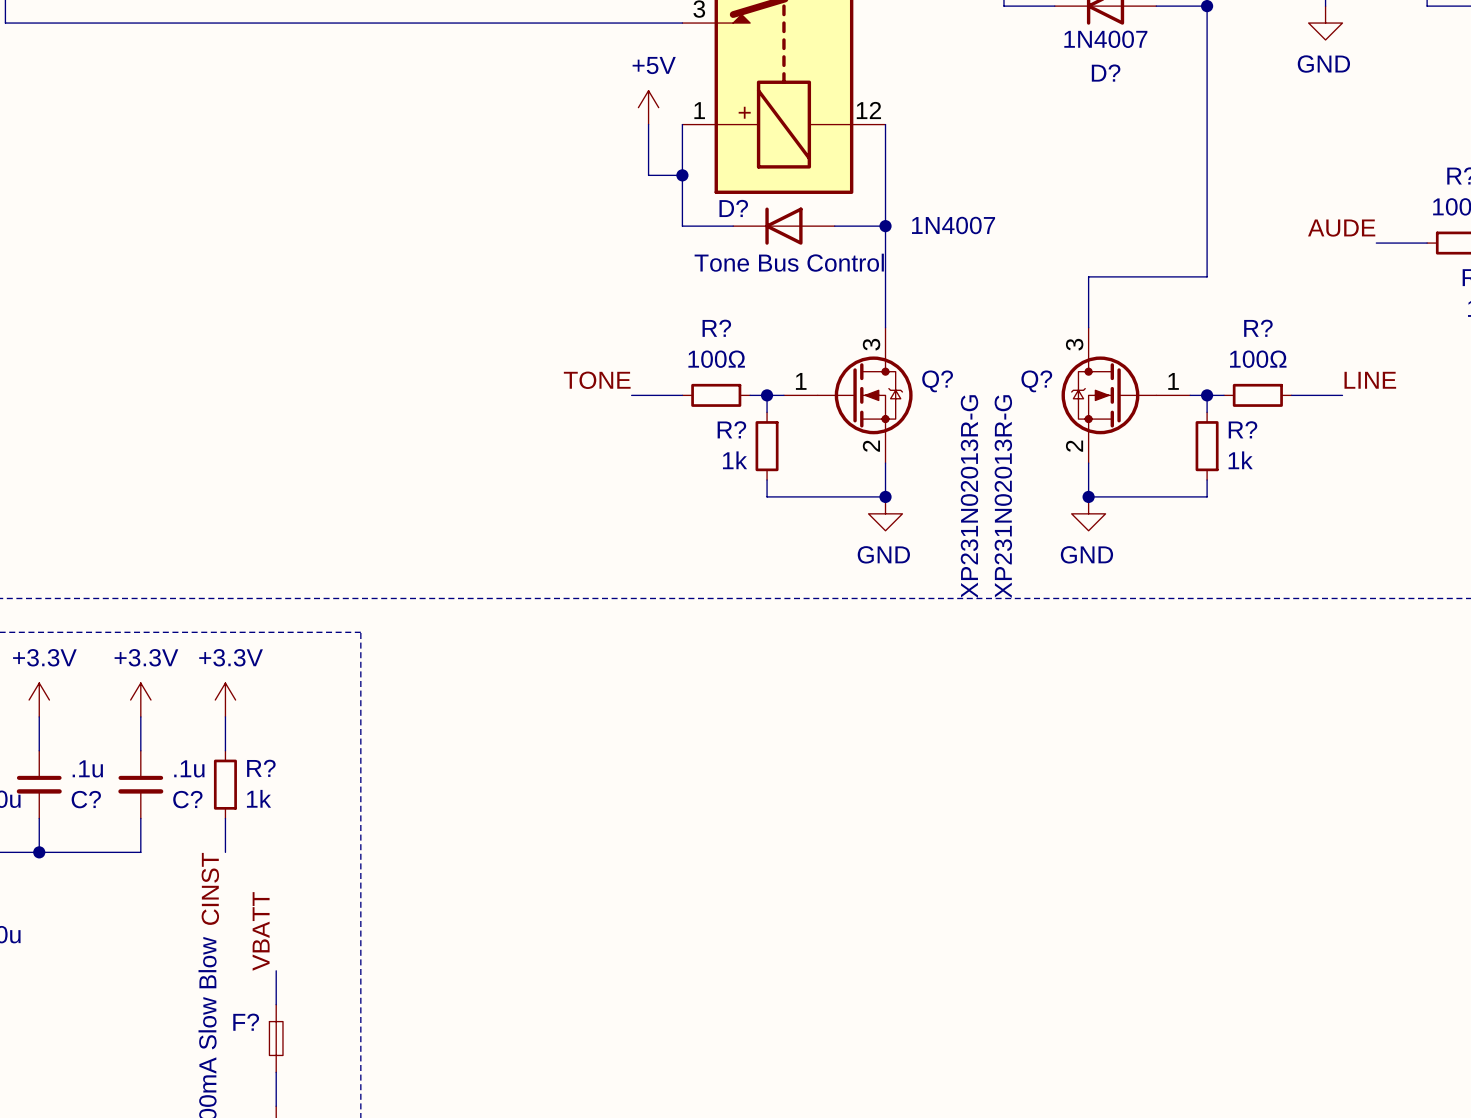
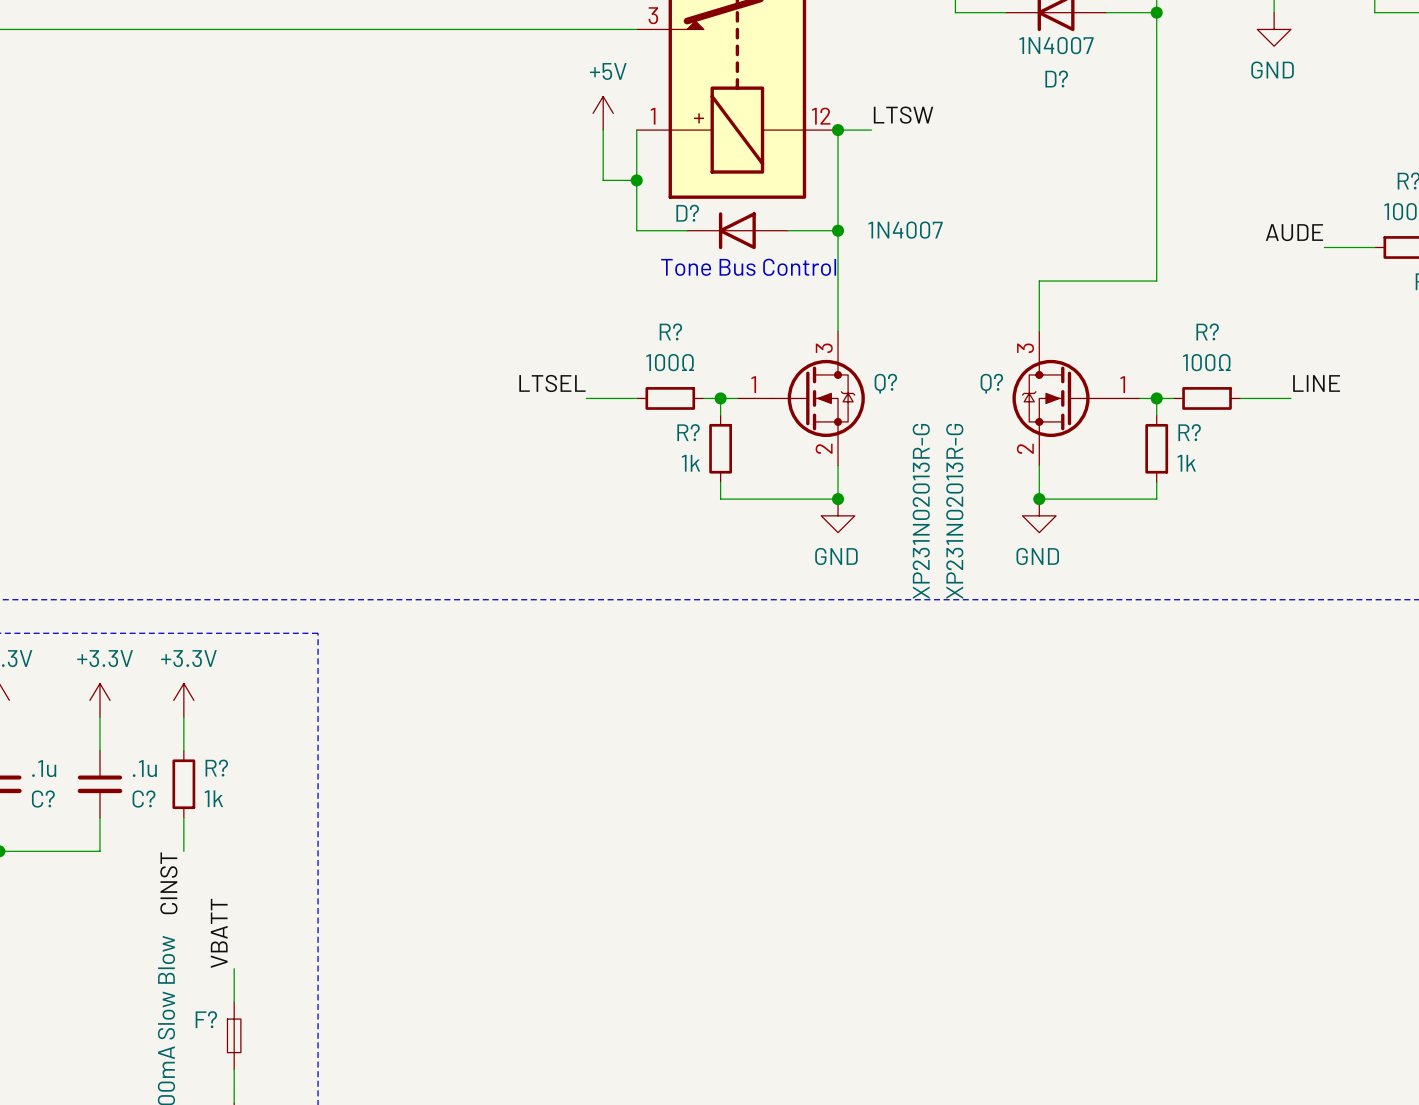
label: none -> LTSW (903, 115)
wire: none -> (838, 130) (871, 130)
junction: none -> (838, 130)
label: TONE (597, 380) -> LTSEL (552, 383)

